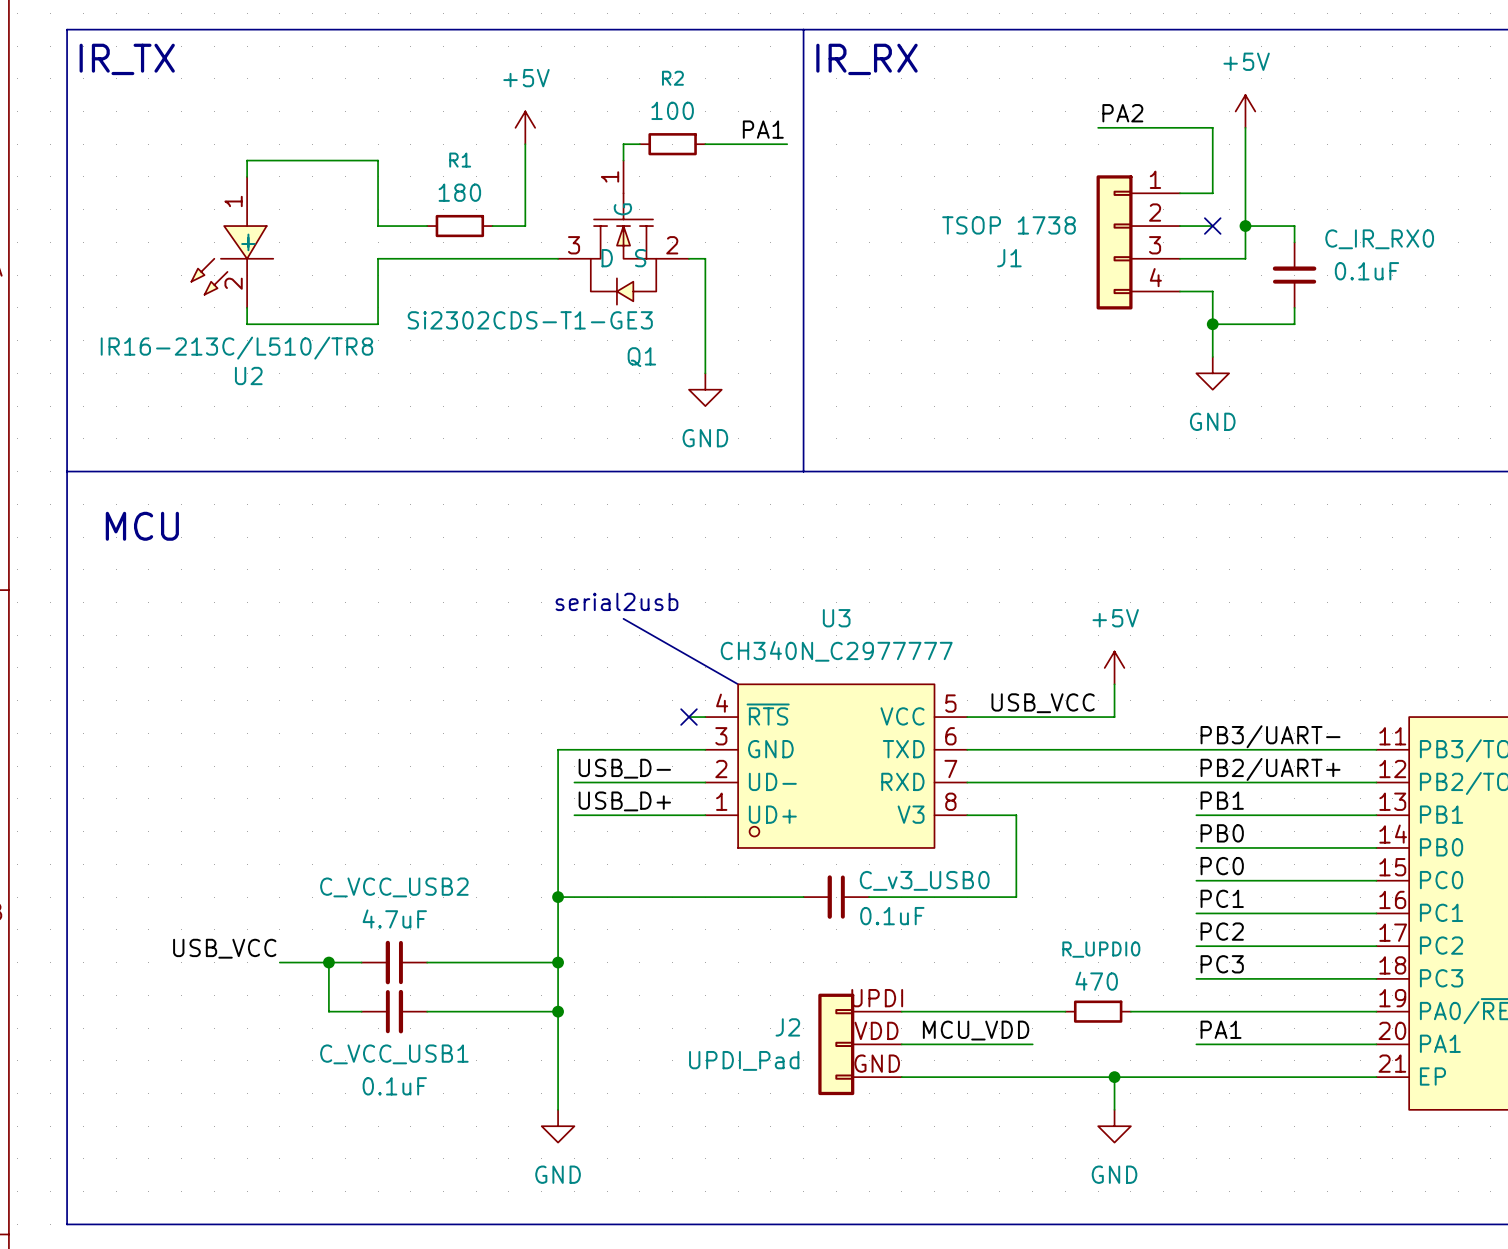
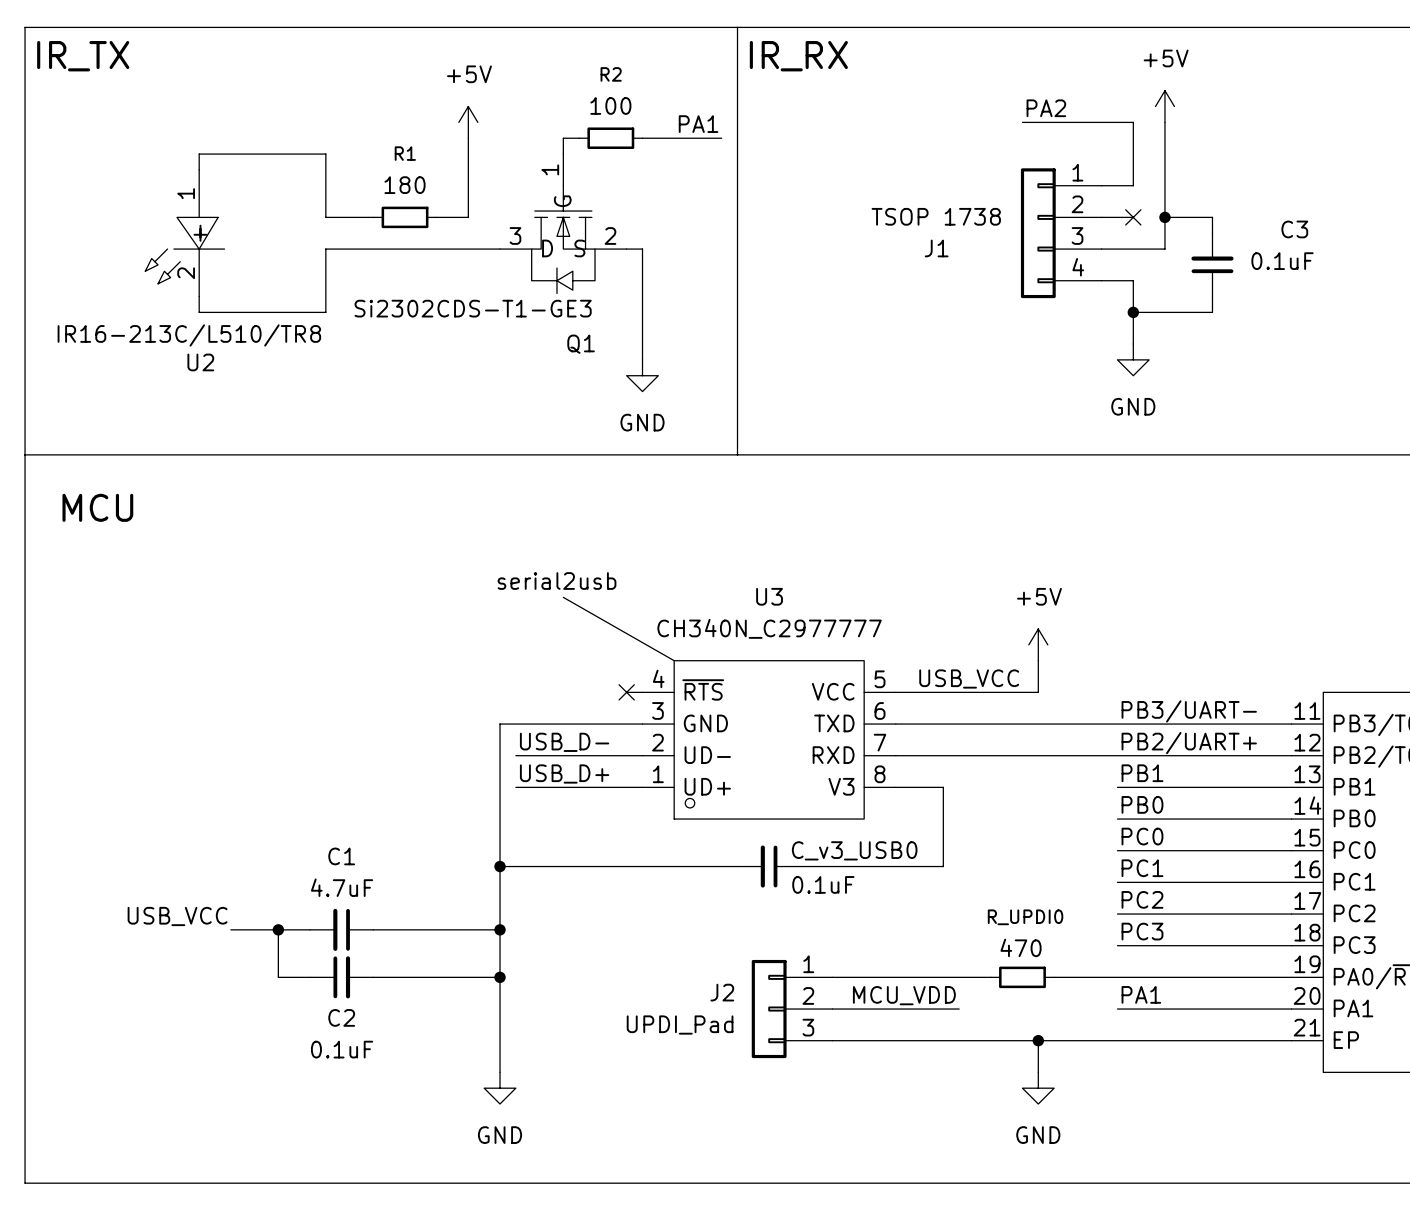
C_IR_RX0 name: C_IR_RX0 (1379, 239) -> C3 (1294, 229)
C_VCC_USB2 name: C_VCC_USB2 (394, 887) -> C1 (341, 856)
J2 pin number: UPDI (877, 998) -> 1 (808, 964)
J2 pin number: VDD (876, 1030) -> 2 (808, 995)
C_VCC_USB1 name: C_VCC_USB1 (394, 1054) -> C2 (341, 1017)
J2 pin number: GND (877, 1063) -> 3 (808, 1027)

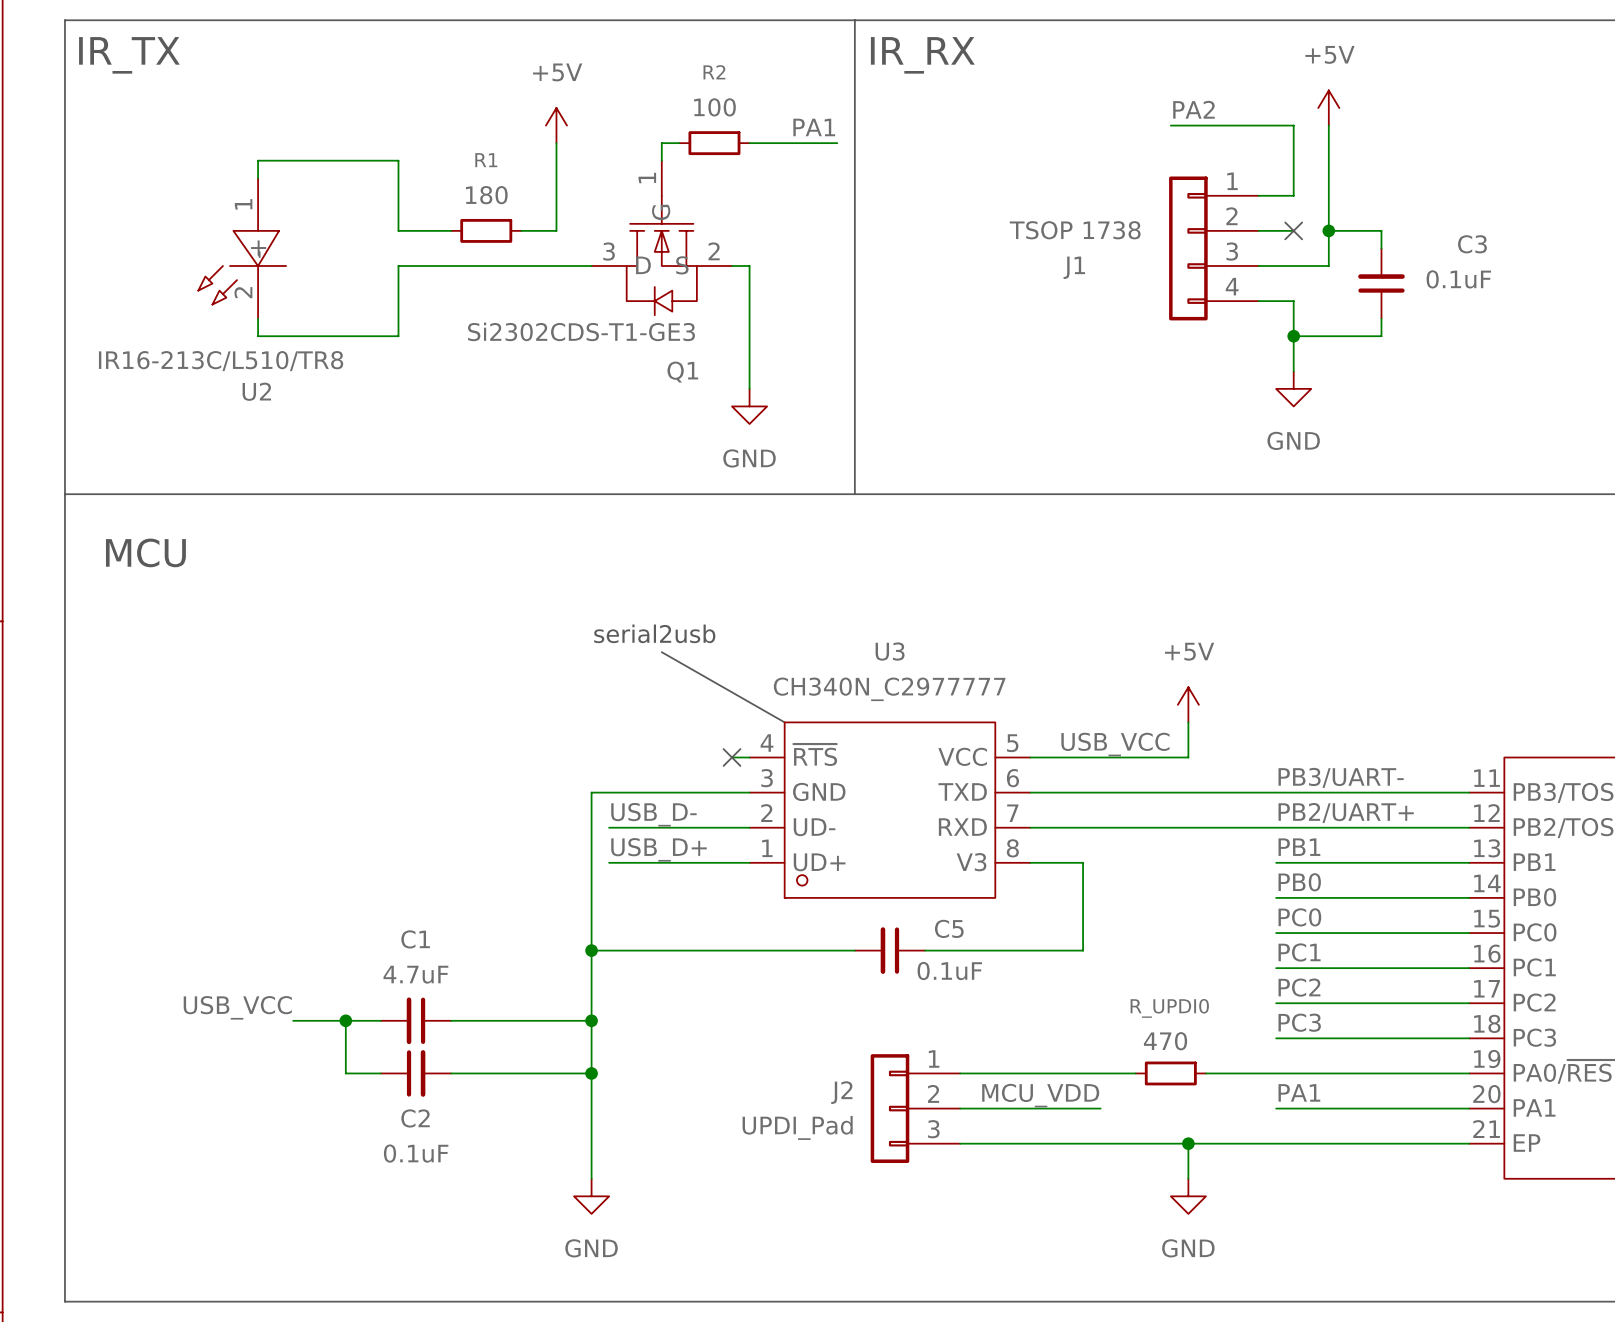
C_v3_USB0 name: C_v3_USB0 (854, 850) -> C5 (949, 928)

